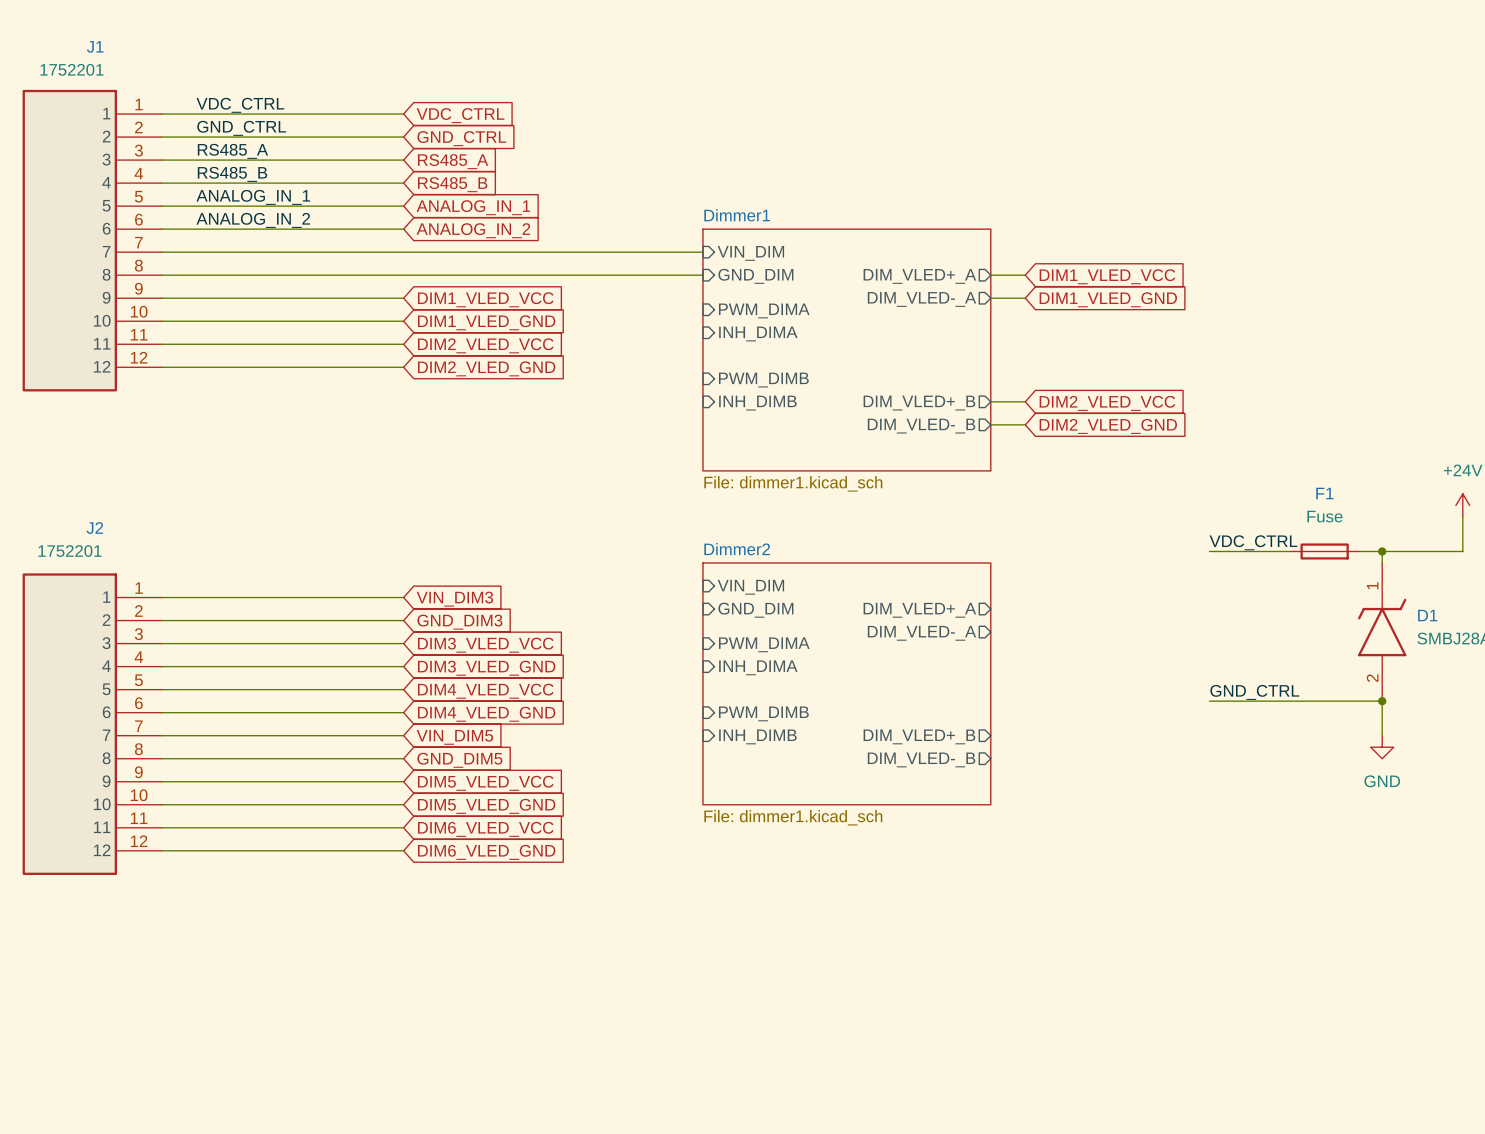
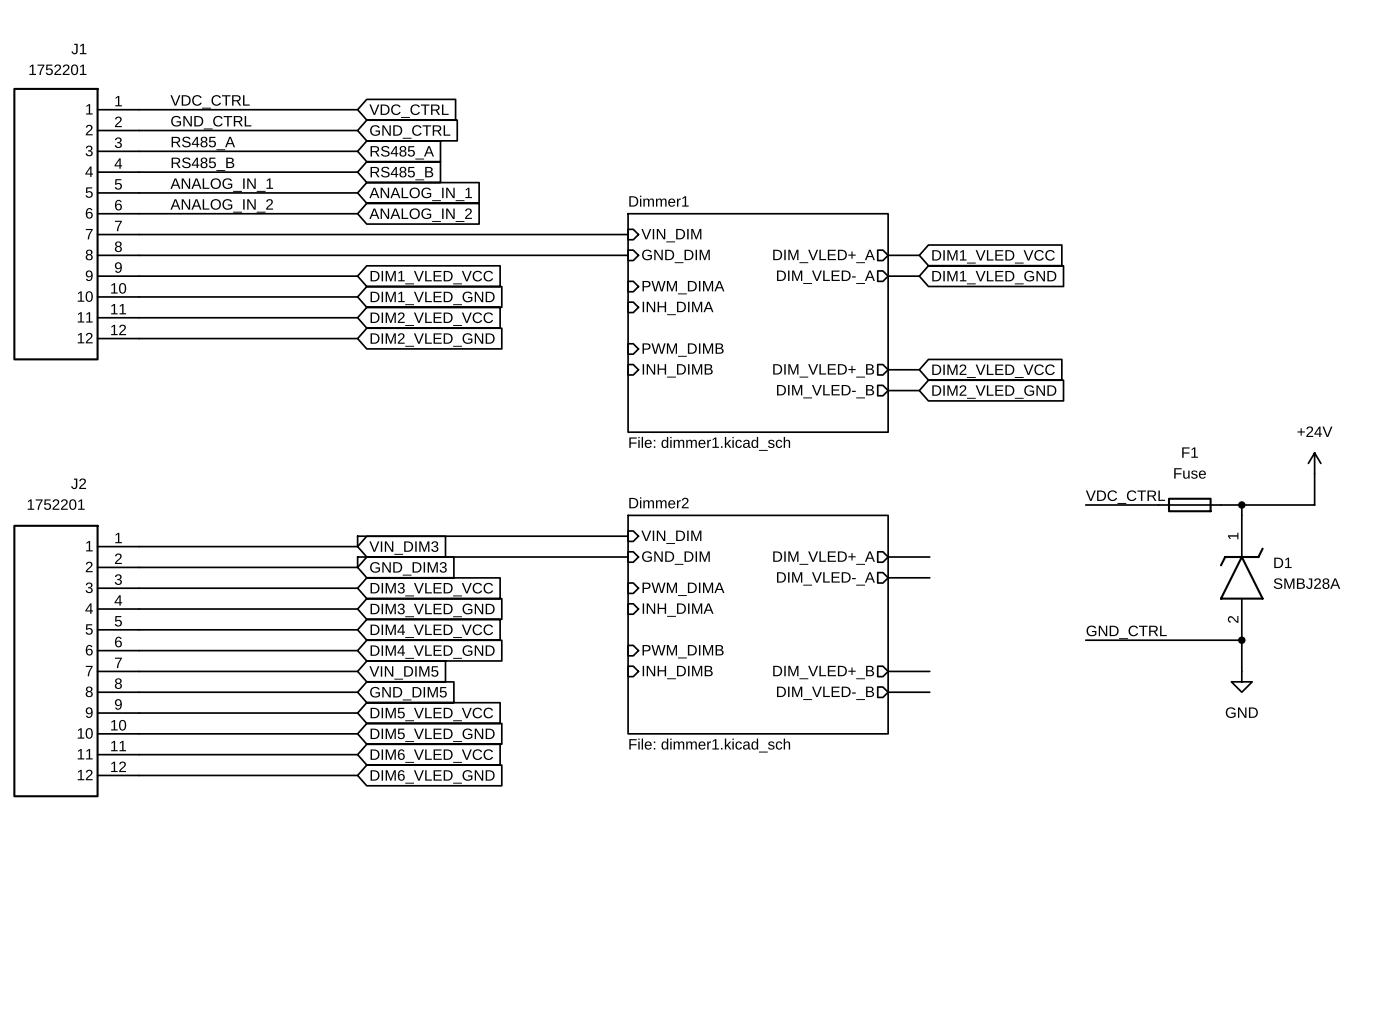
wire: none -> (628, 536) (357, 536) (357, 546)
wire: none -> (628, 557) (357, 557) (357, 567)
wire: none -> (888, 557) (929, 557)
wire: none -> (888, 577) (929, 577)
wire: none -> (888, 671) (929, 671)
wire: none -> (888, 692) (929, 692)

